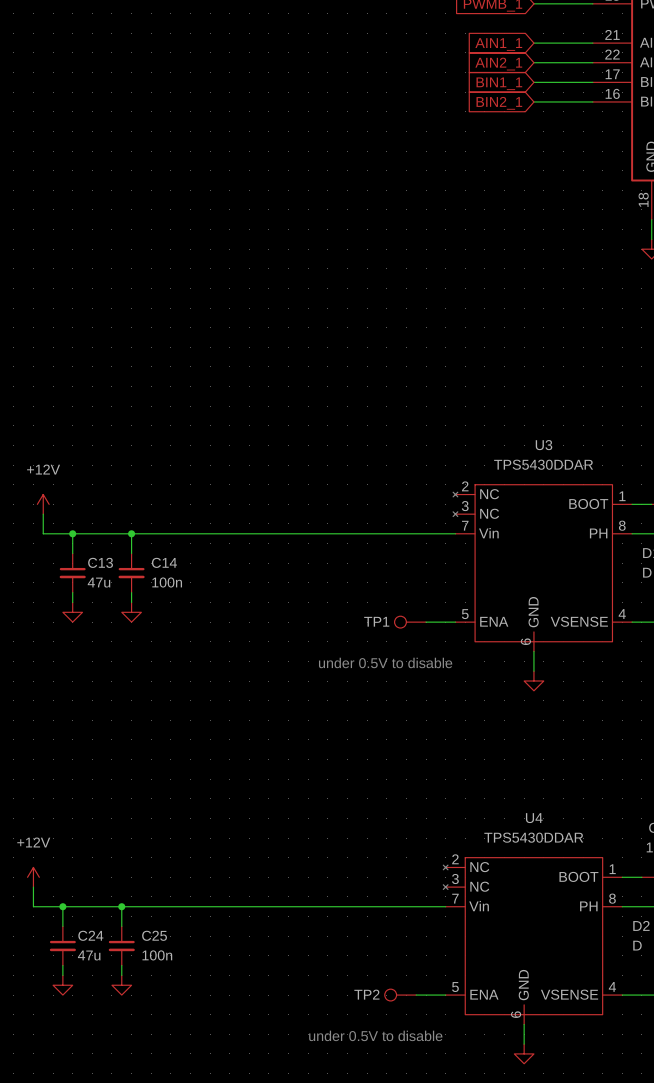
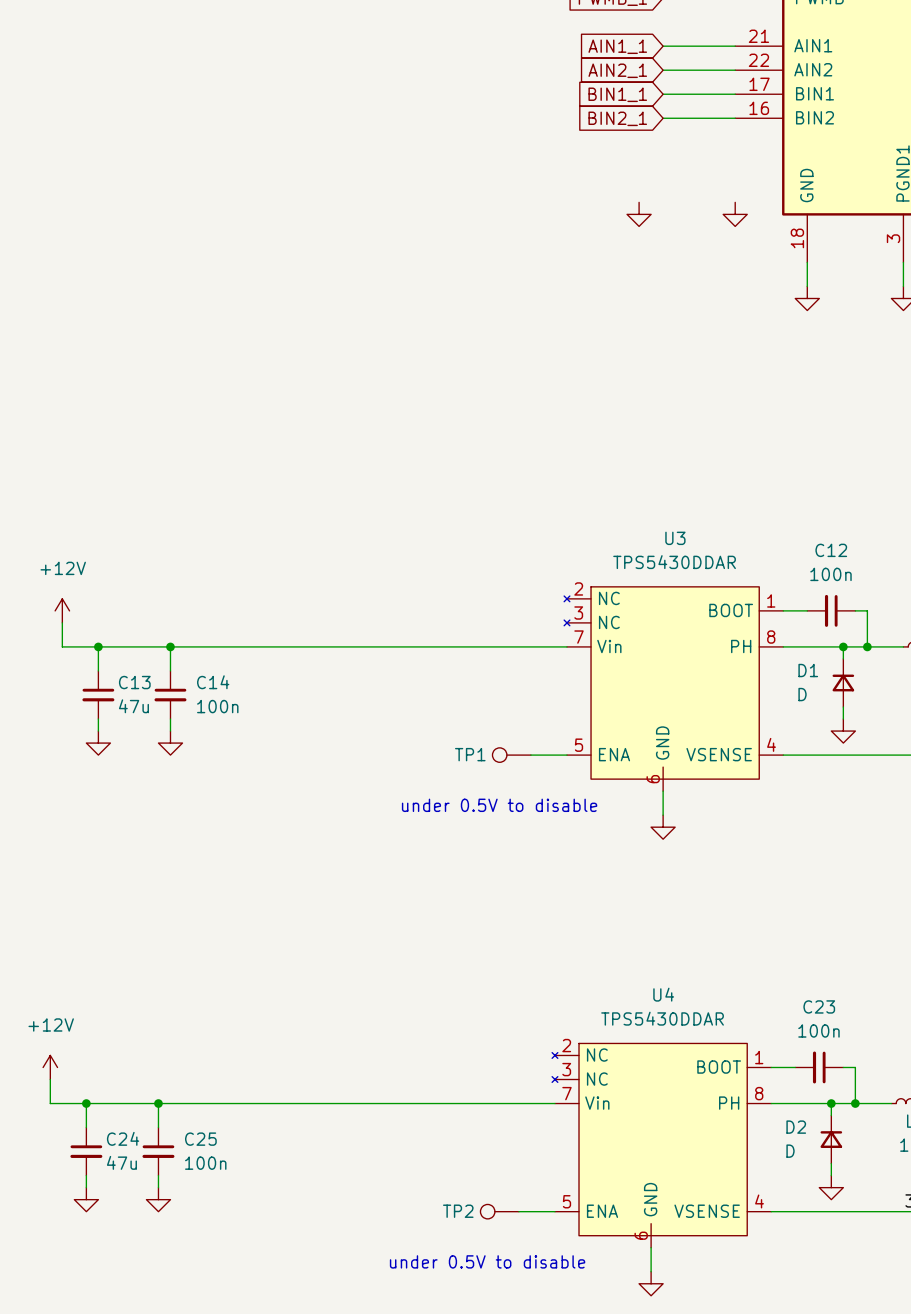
power symbol: none -> (639, 214)
power symbol: none -> (735, 214)

